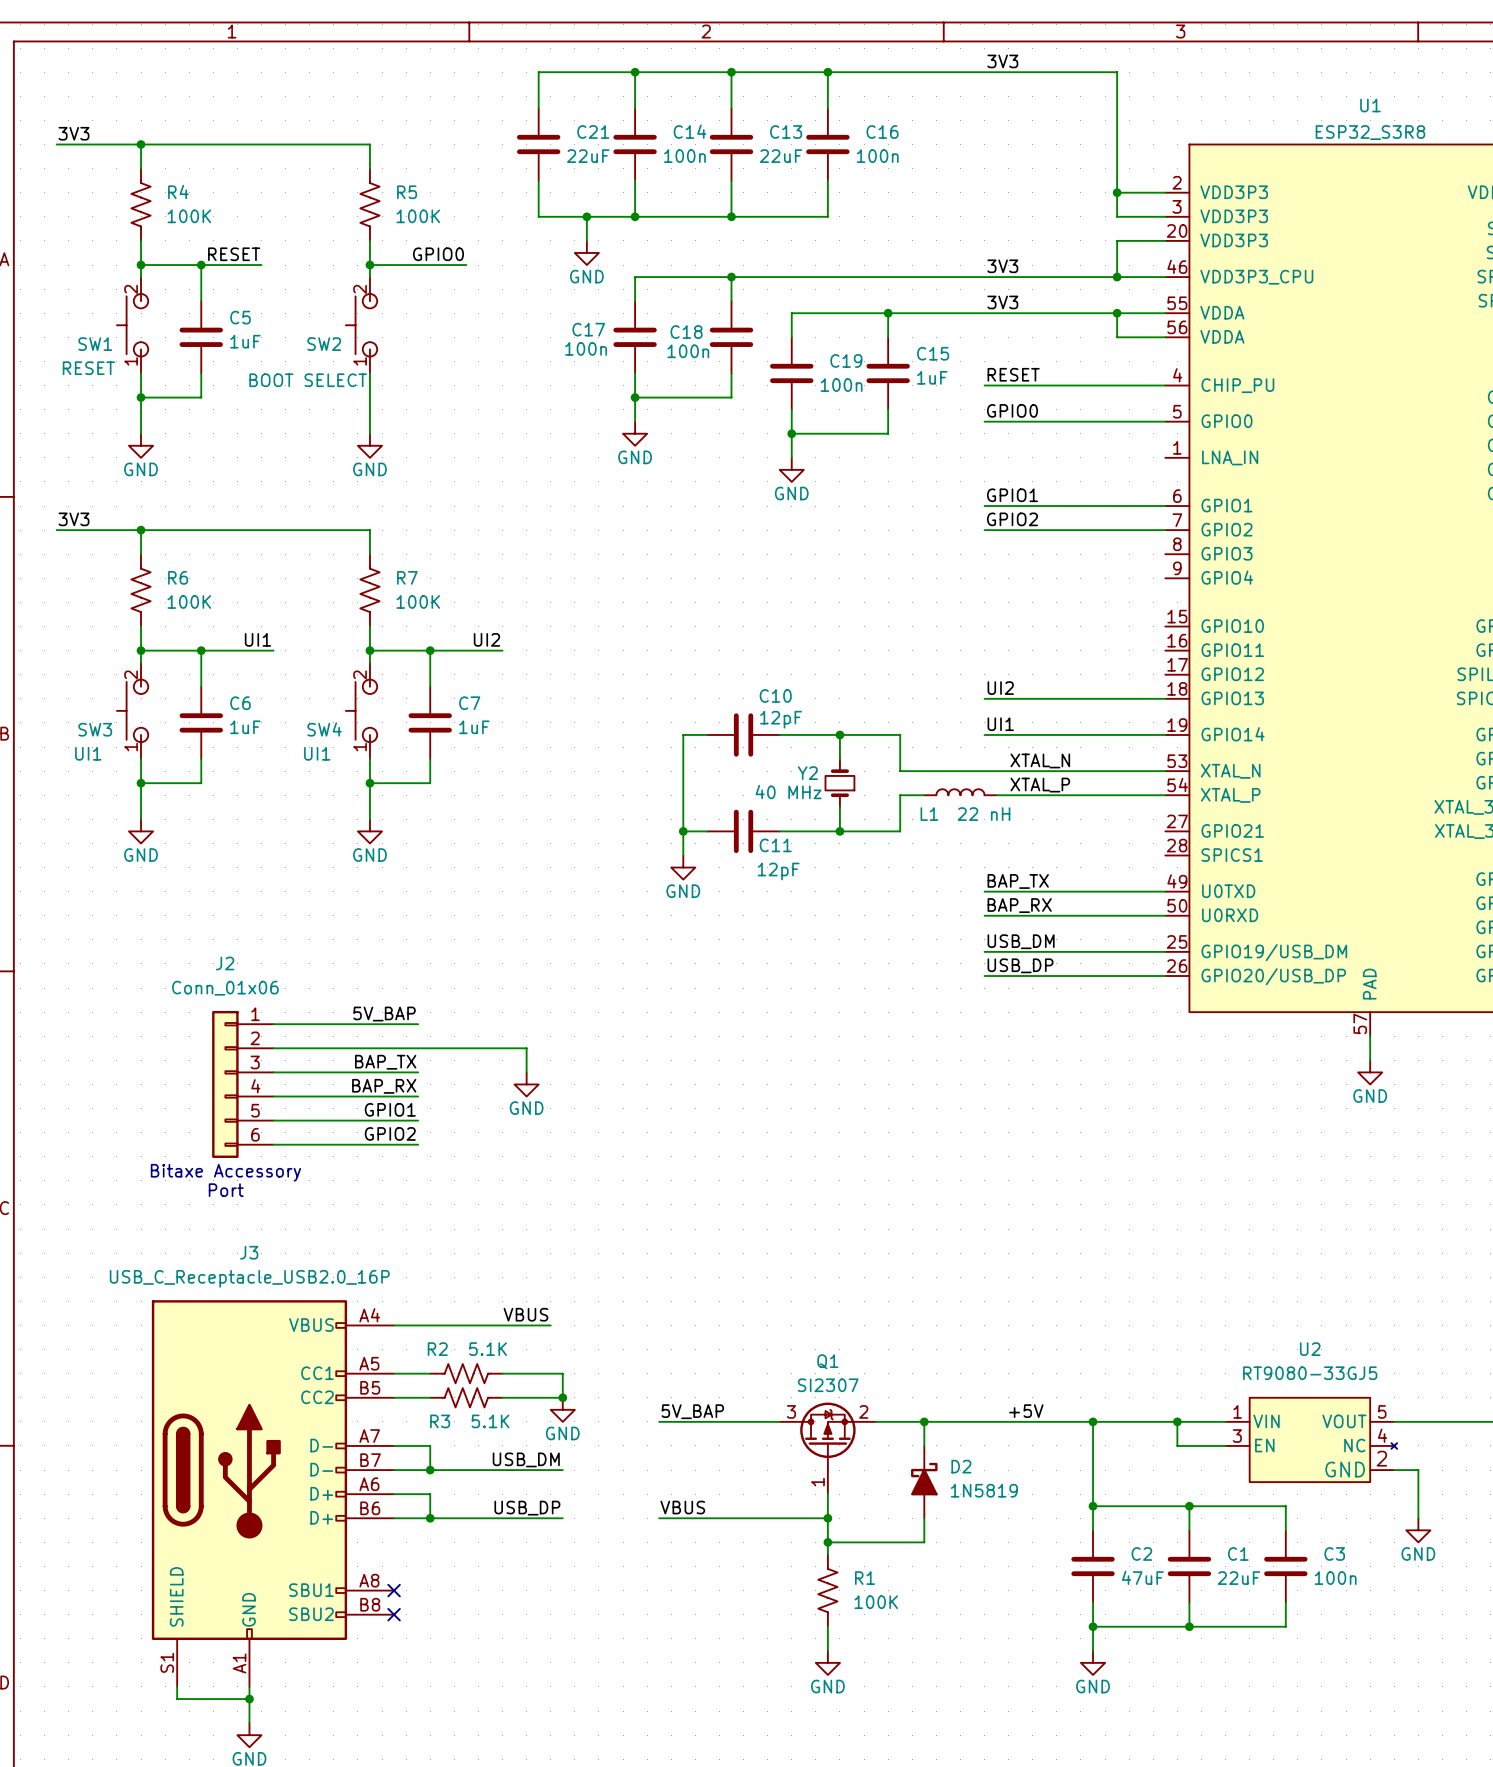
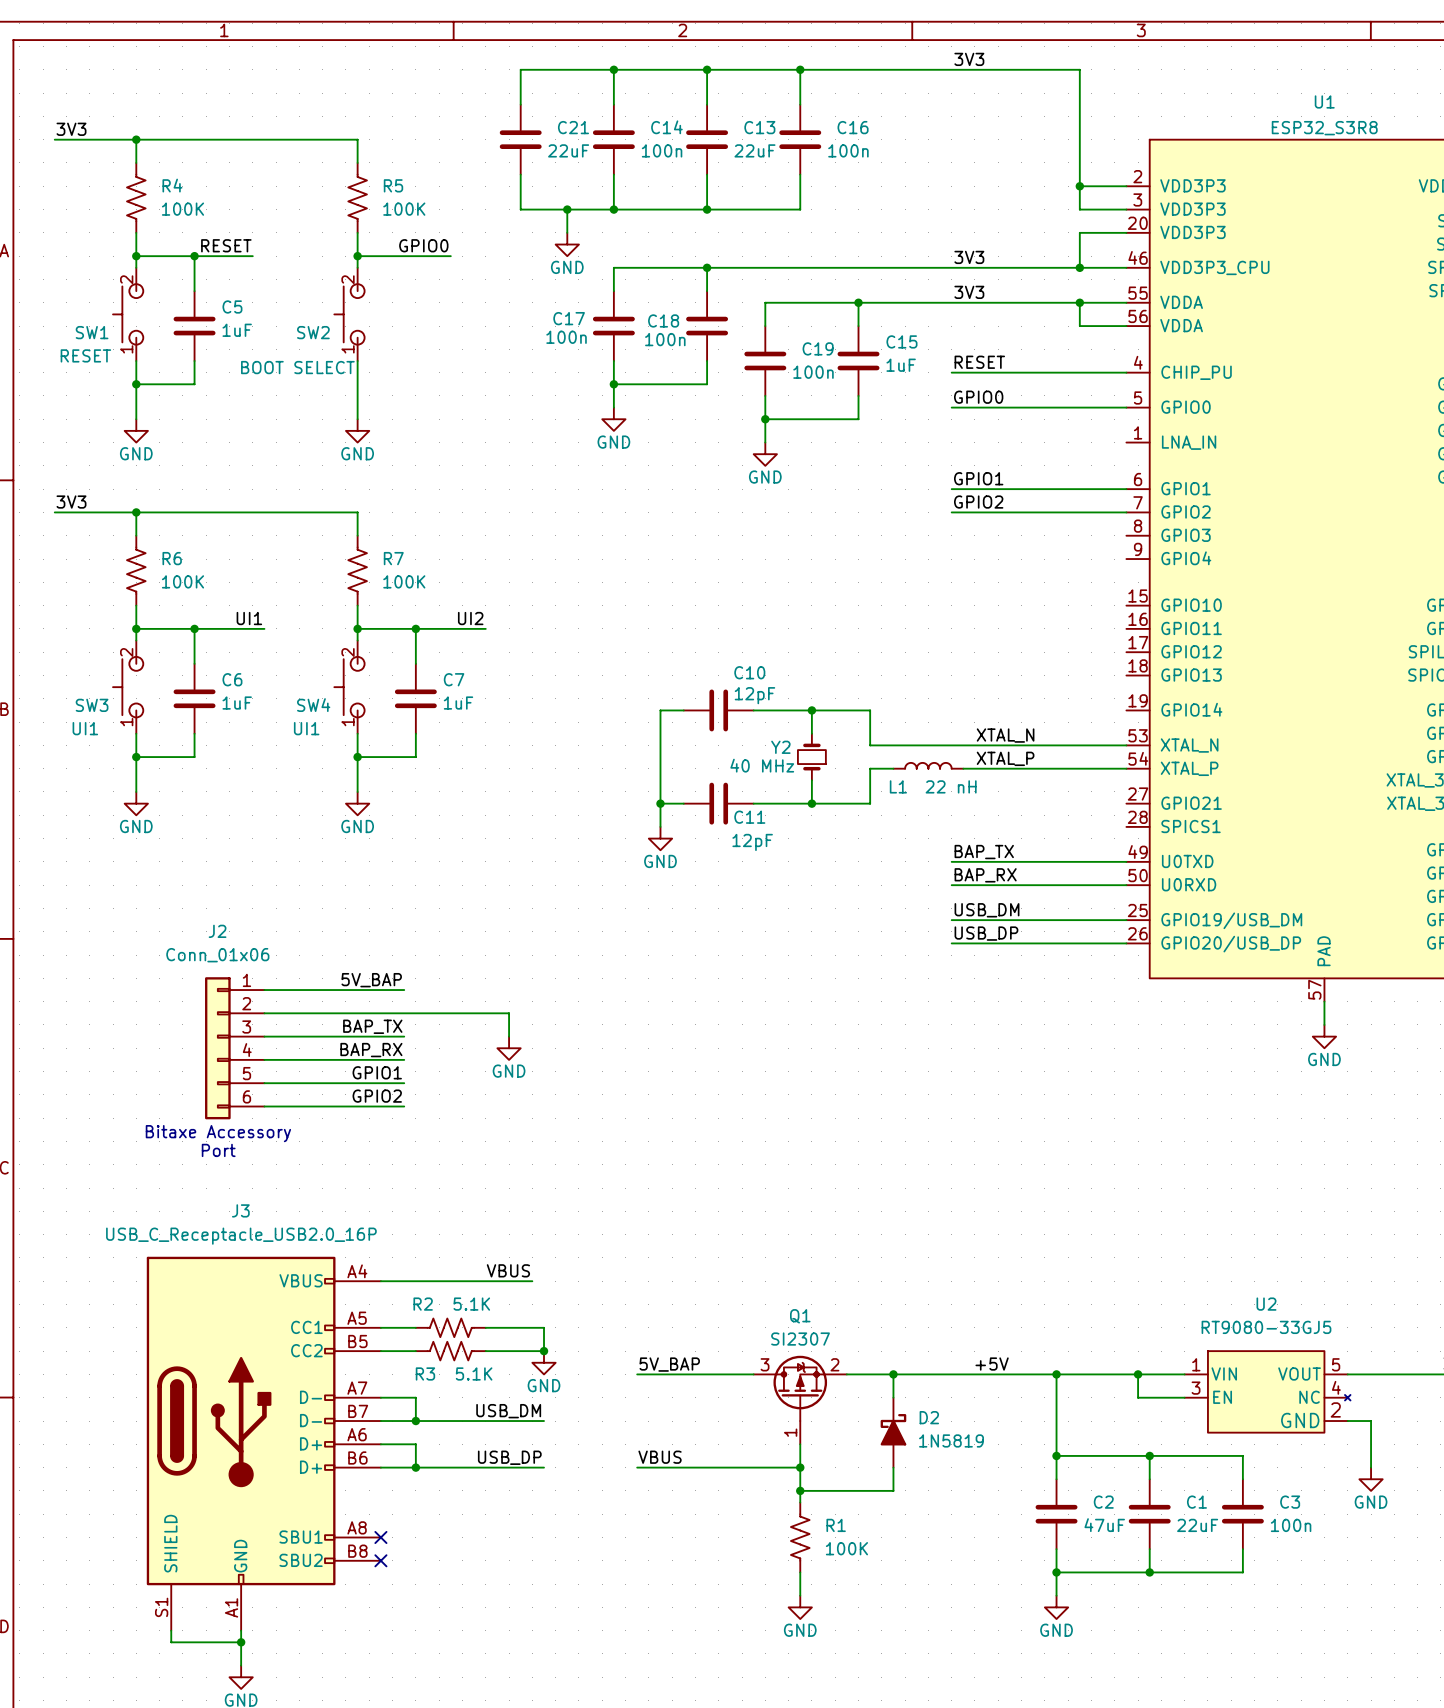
label: UI2 (1000, 688) -> none
wire: (984, 698) (1165, 698) -> none
label: UI1 (1000, 724) -> none
wire: (984, 734) (1165, 734) -> none

